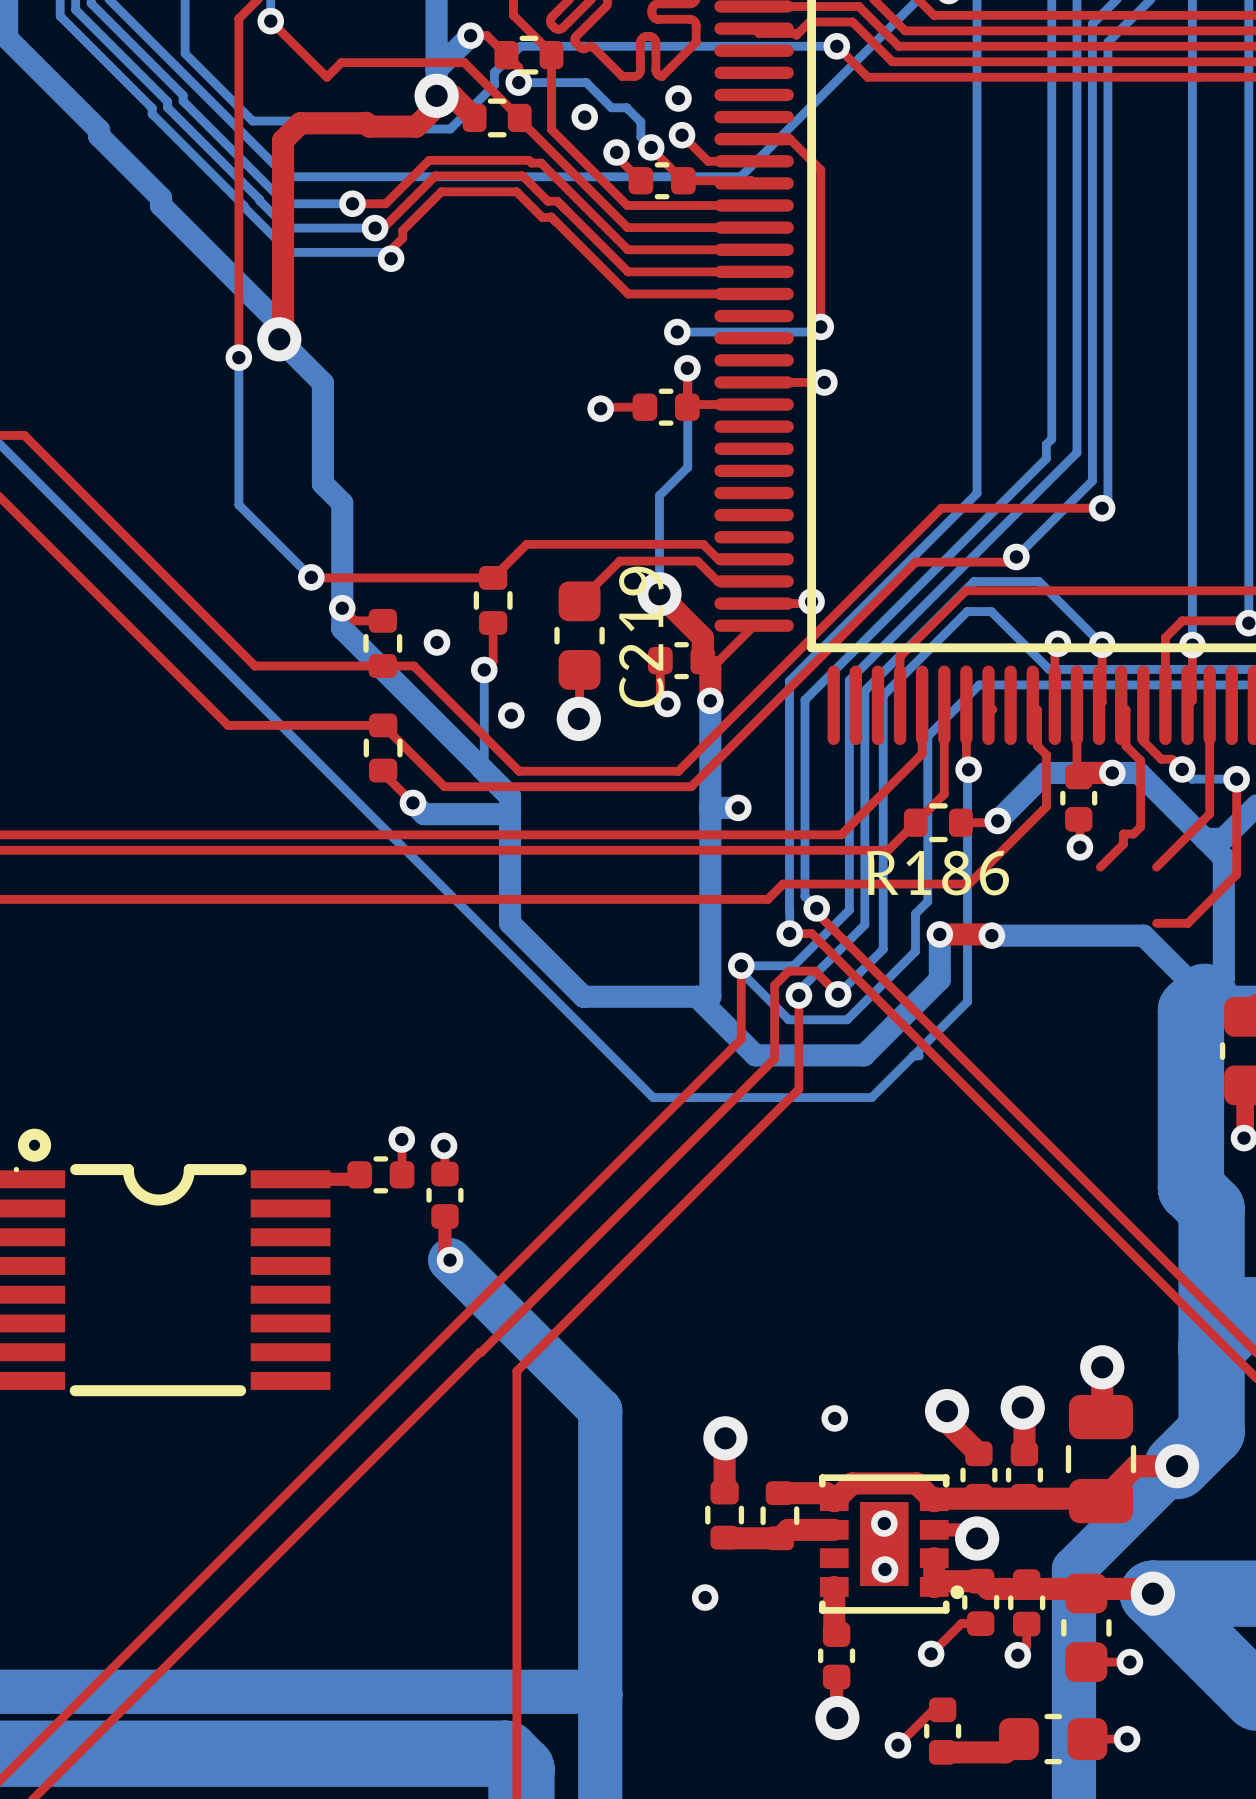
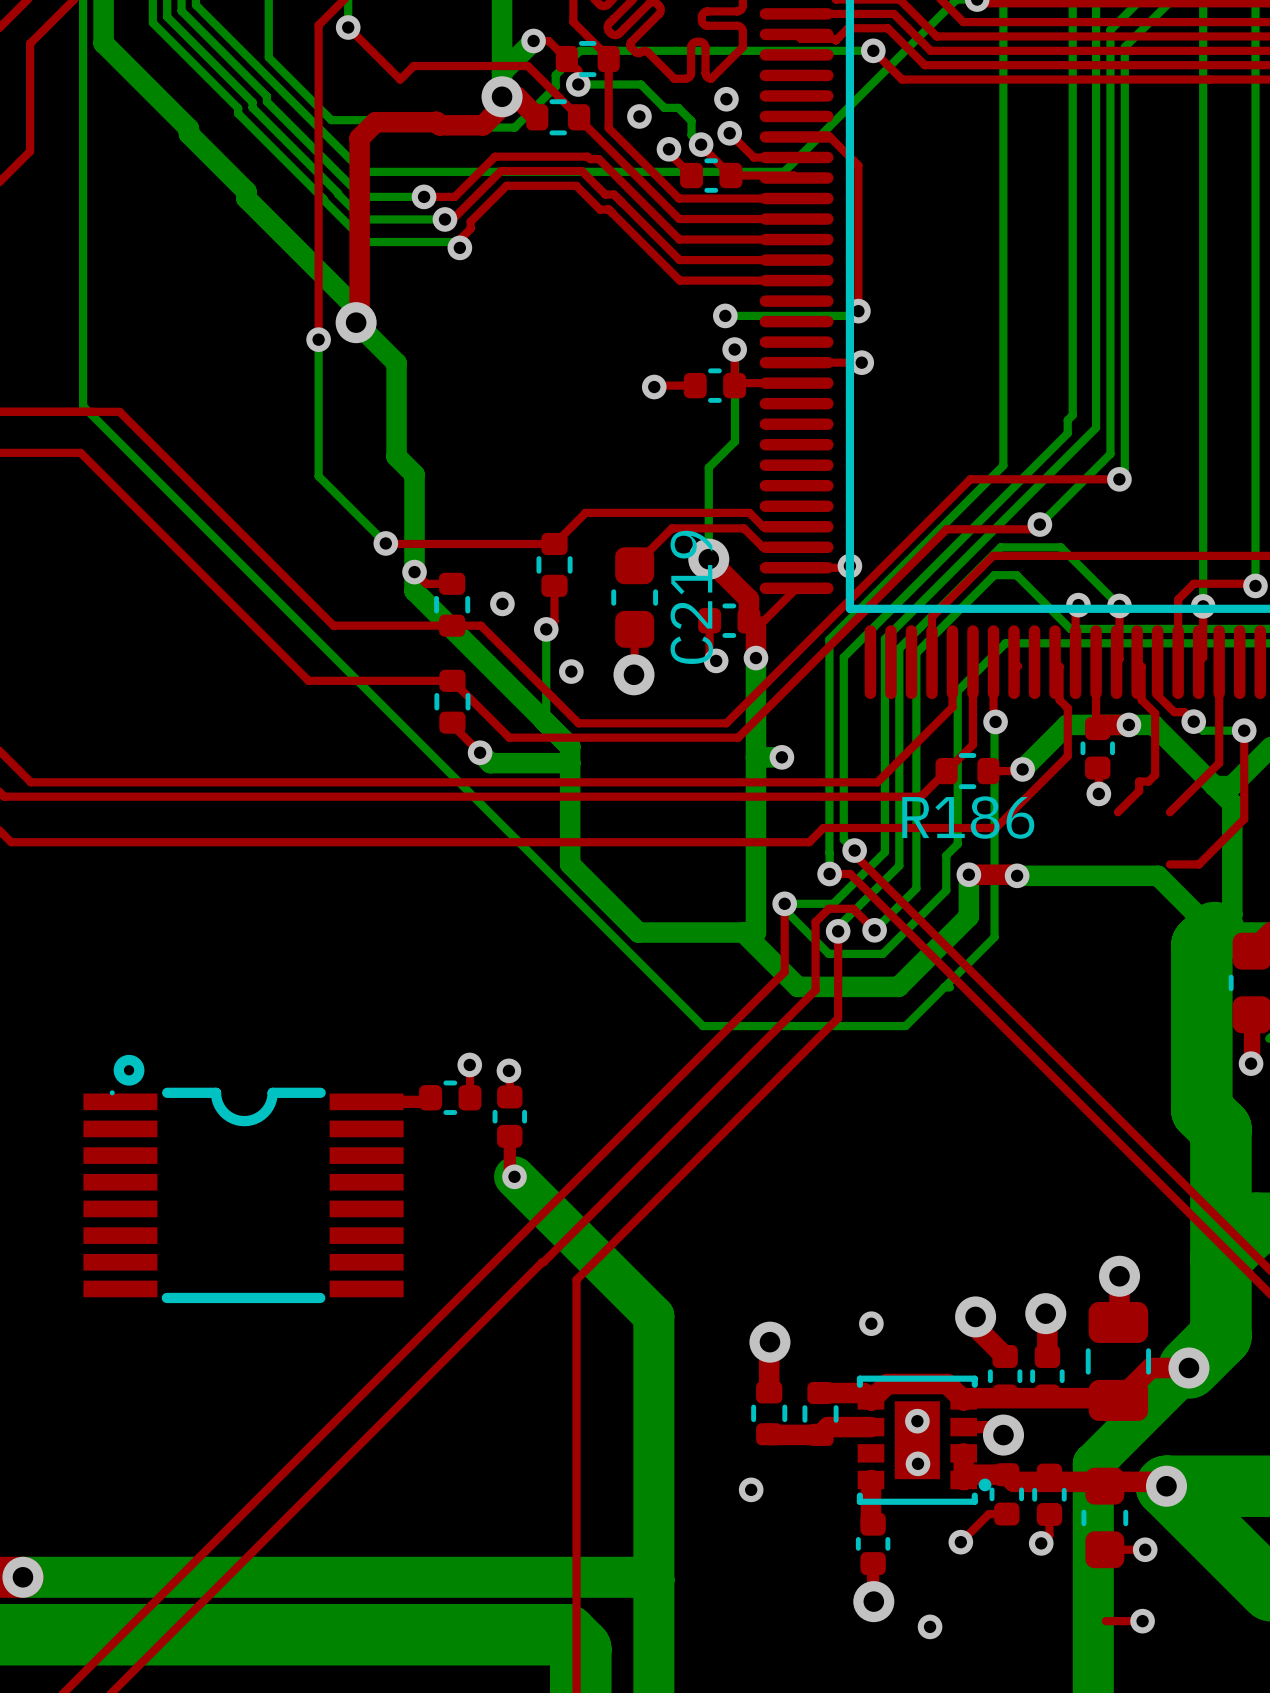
top track: (933, 1709) (897, 1745) -> none
part: (942, 1731) -> none
top track: (1018, 1739) (1005, 1752) (942, 1752) -> none
part: (1053, 1739) -> none

